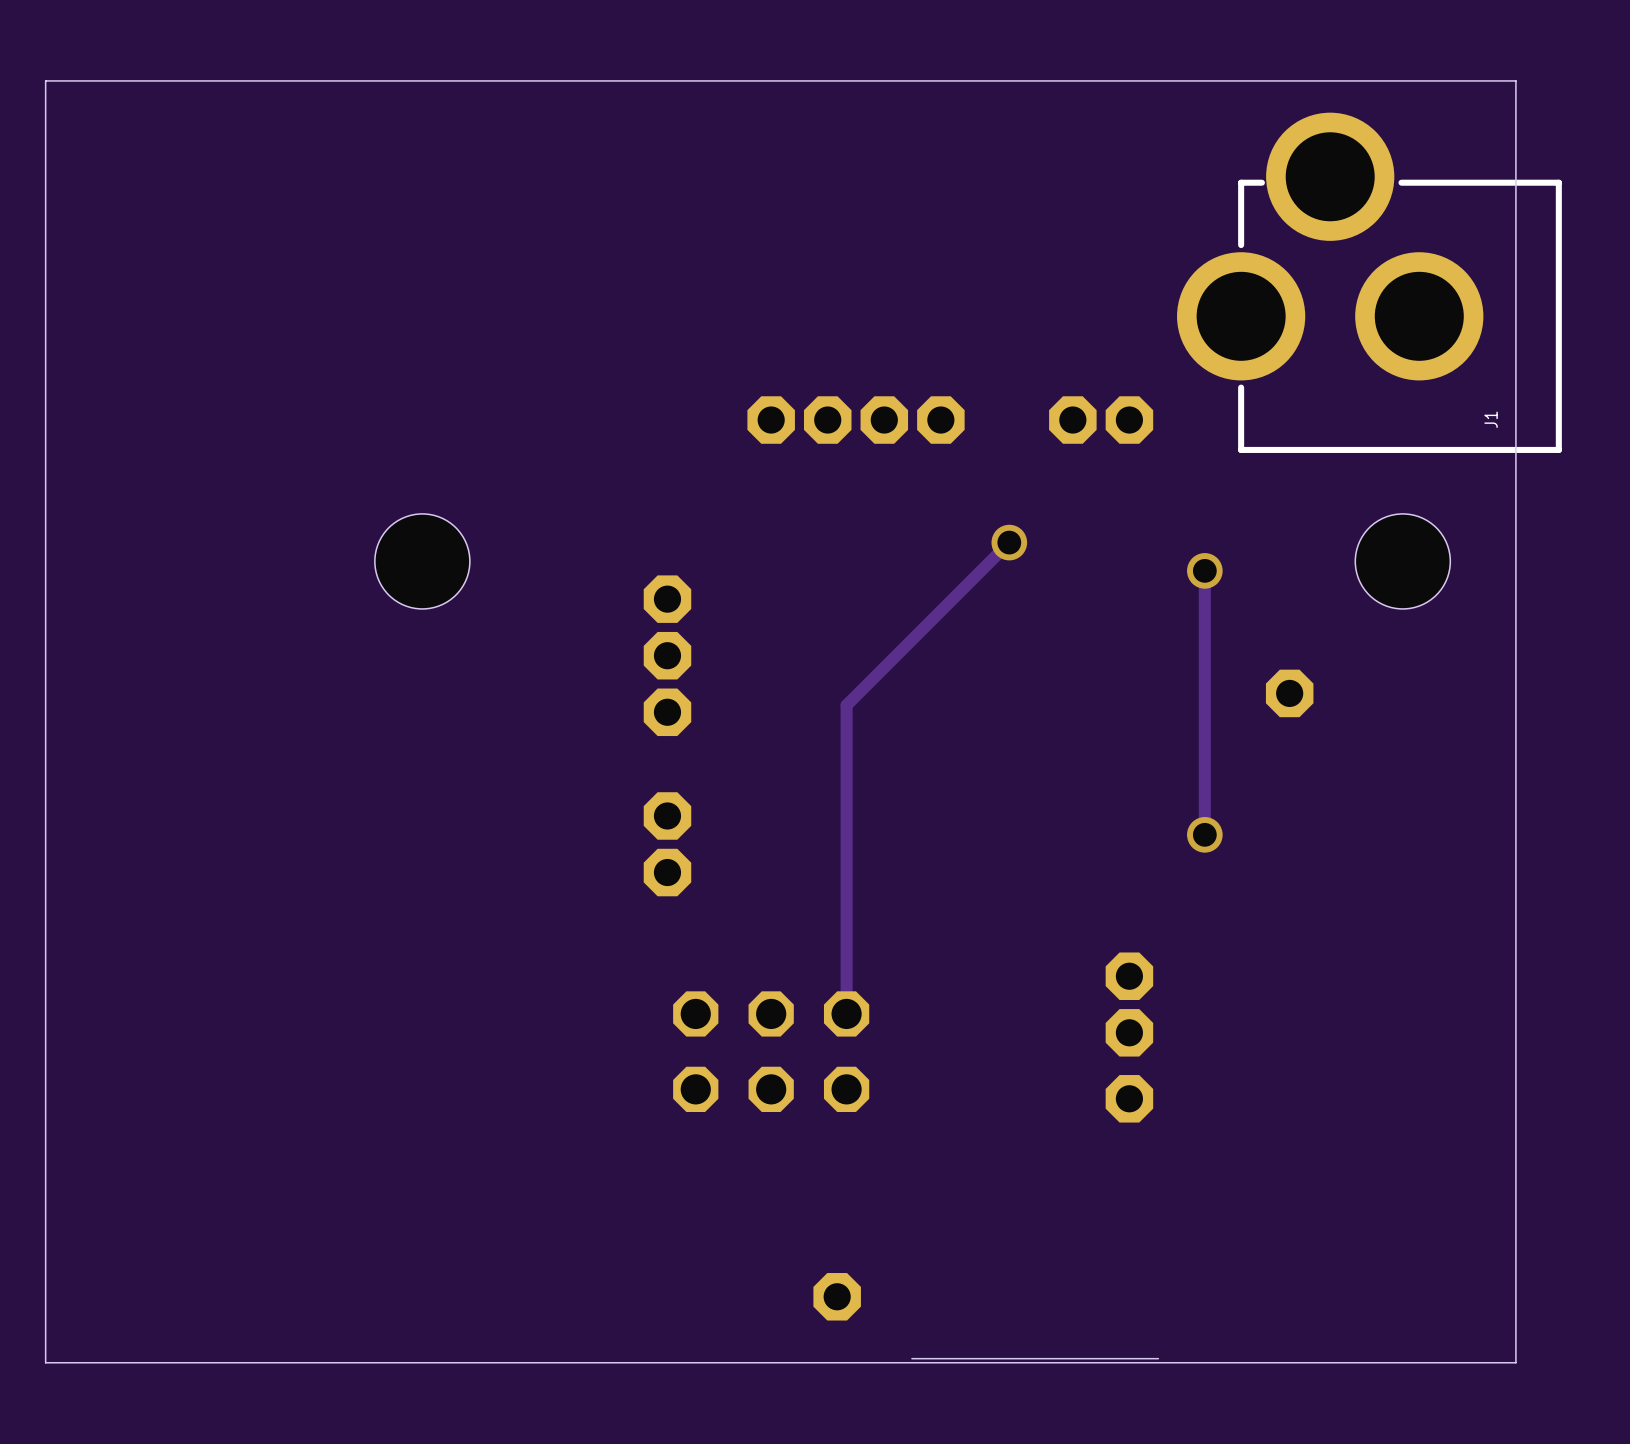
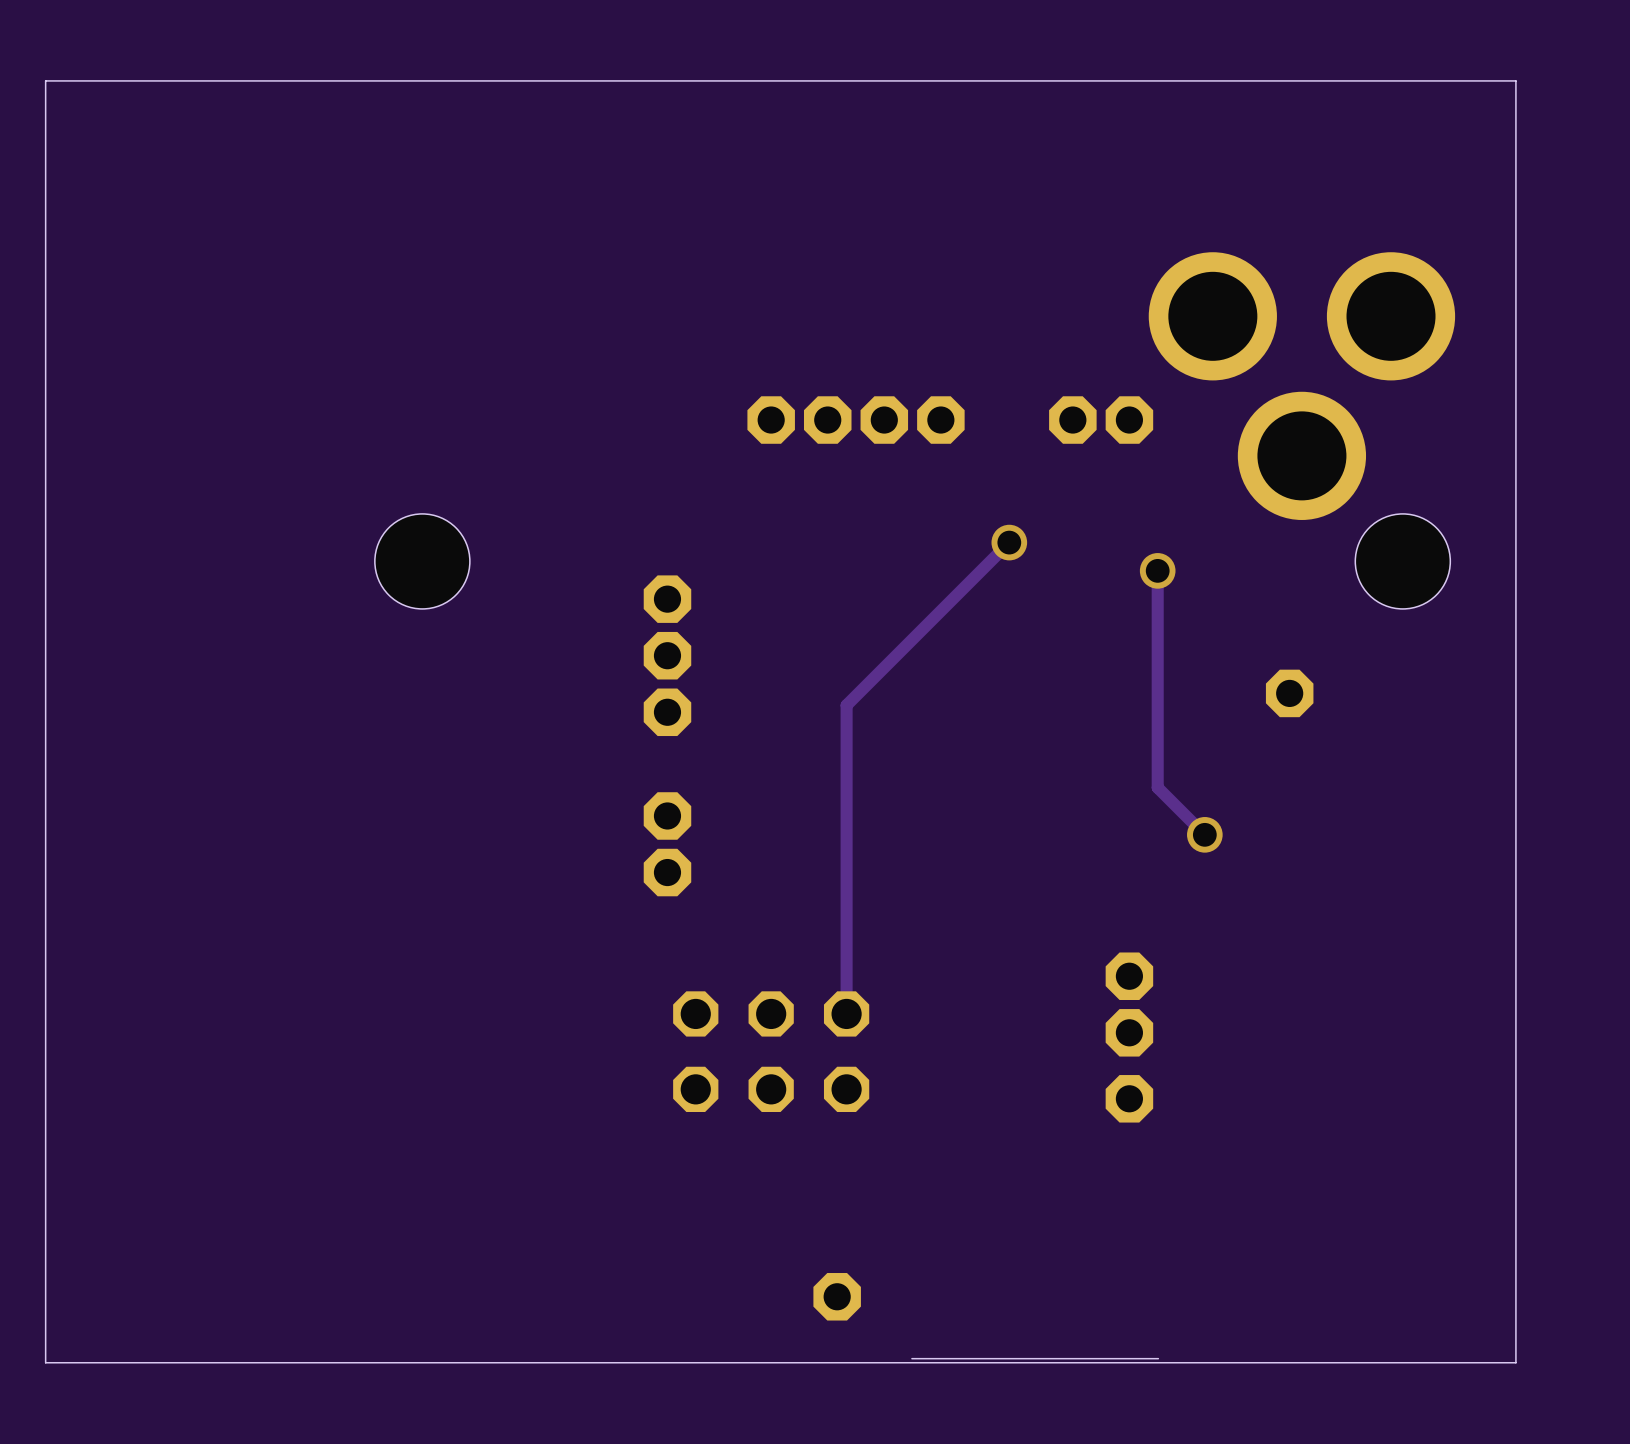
J1 side: bottom (1369, 282) -> top (1301, 386)
track: (1204, 570) (1204, 834) -> (1157, 570) (1157, 787) (1204, 834)
via position: (1204, 570) -> (1157, 570)

